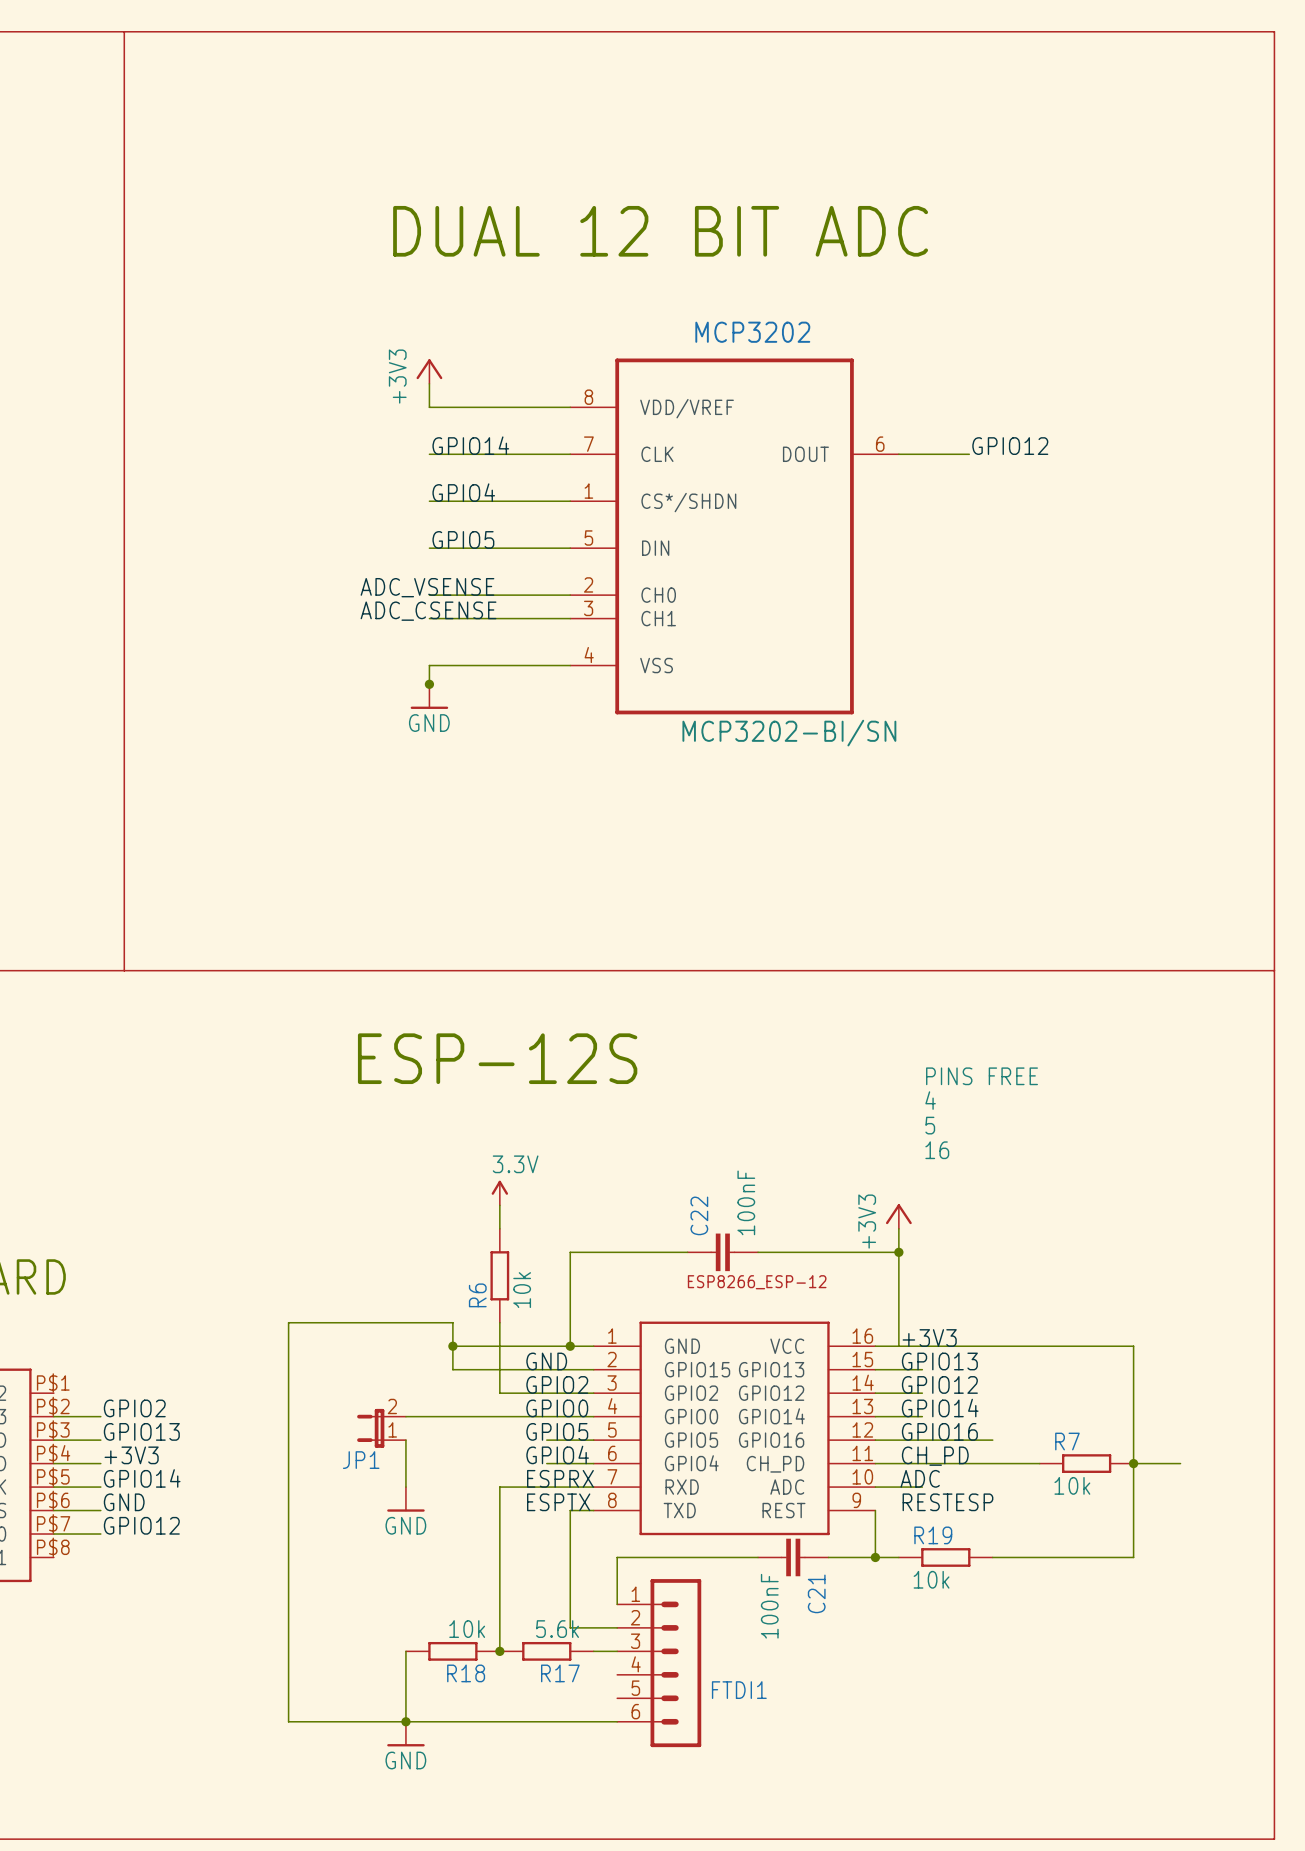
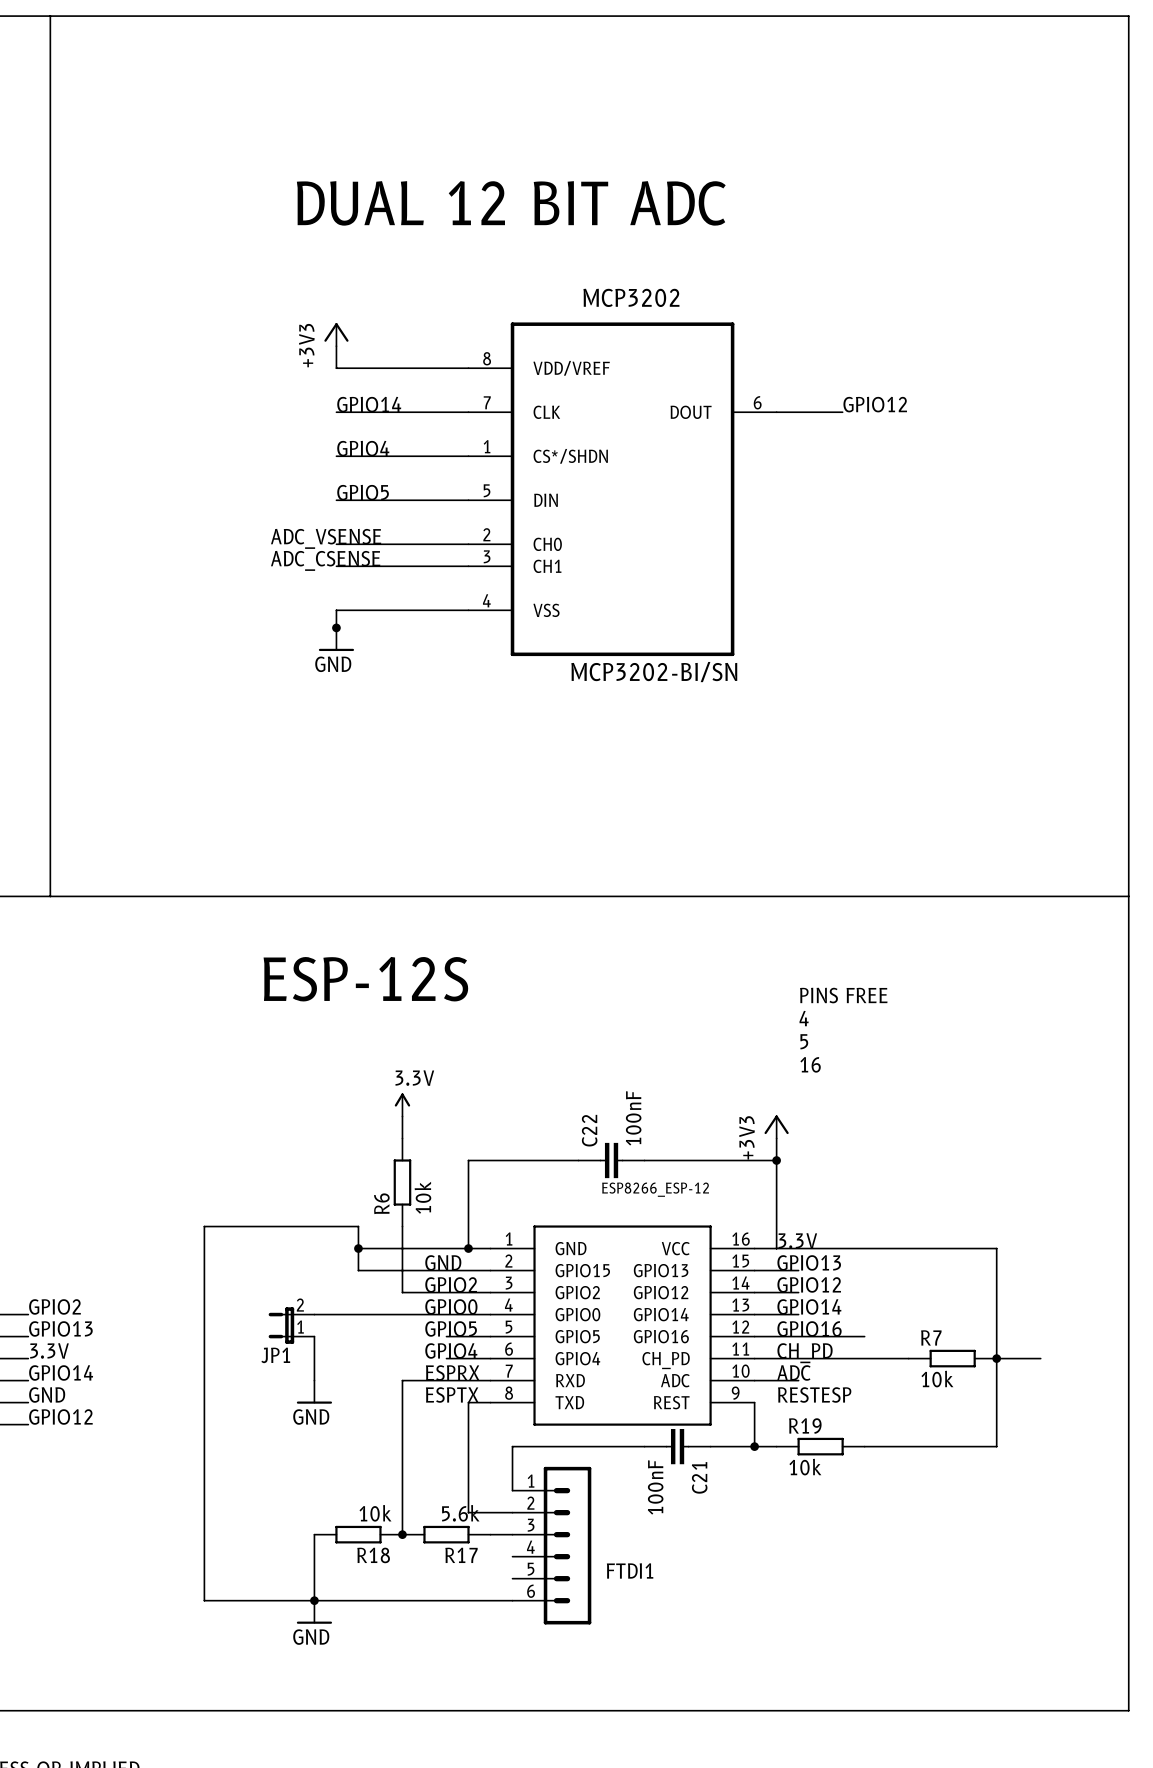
label: +3V3 (929, 1338) -> 3.3V (797, 1240)
label: +3V3 (131, 1455) -> 3.3V (49, 1350)

